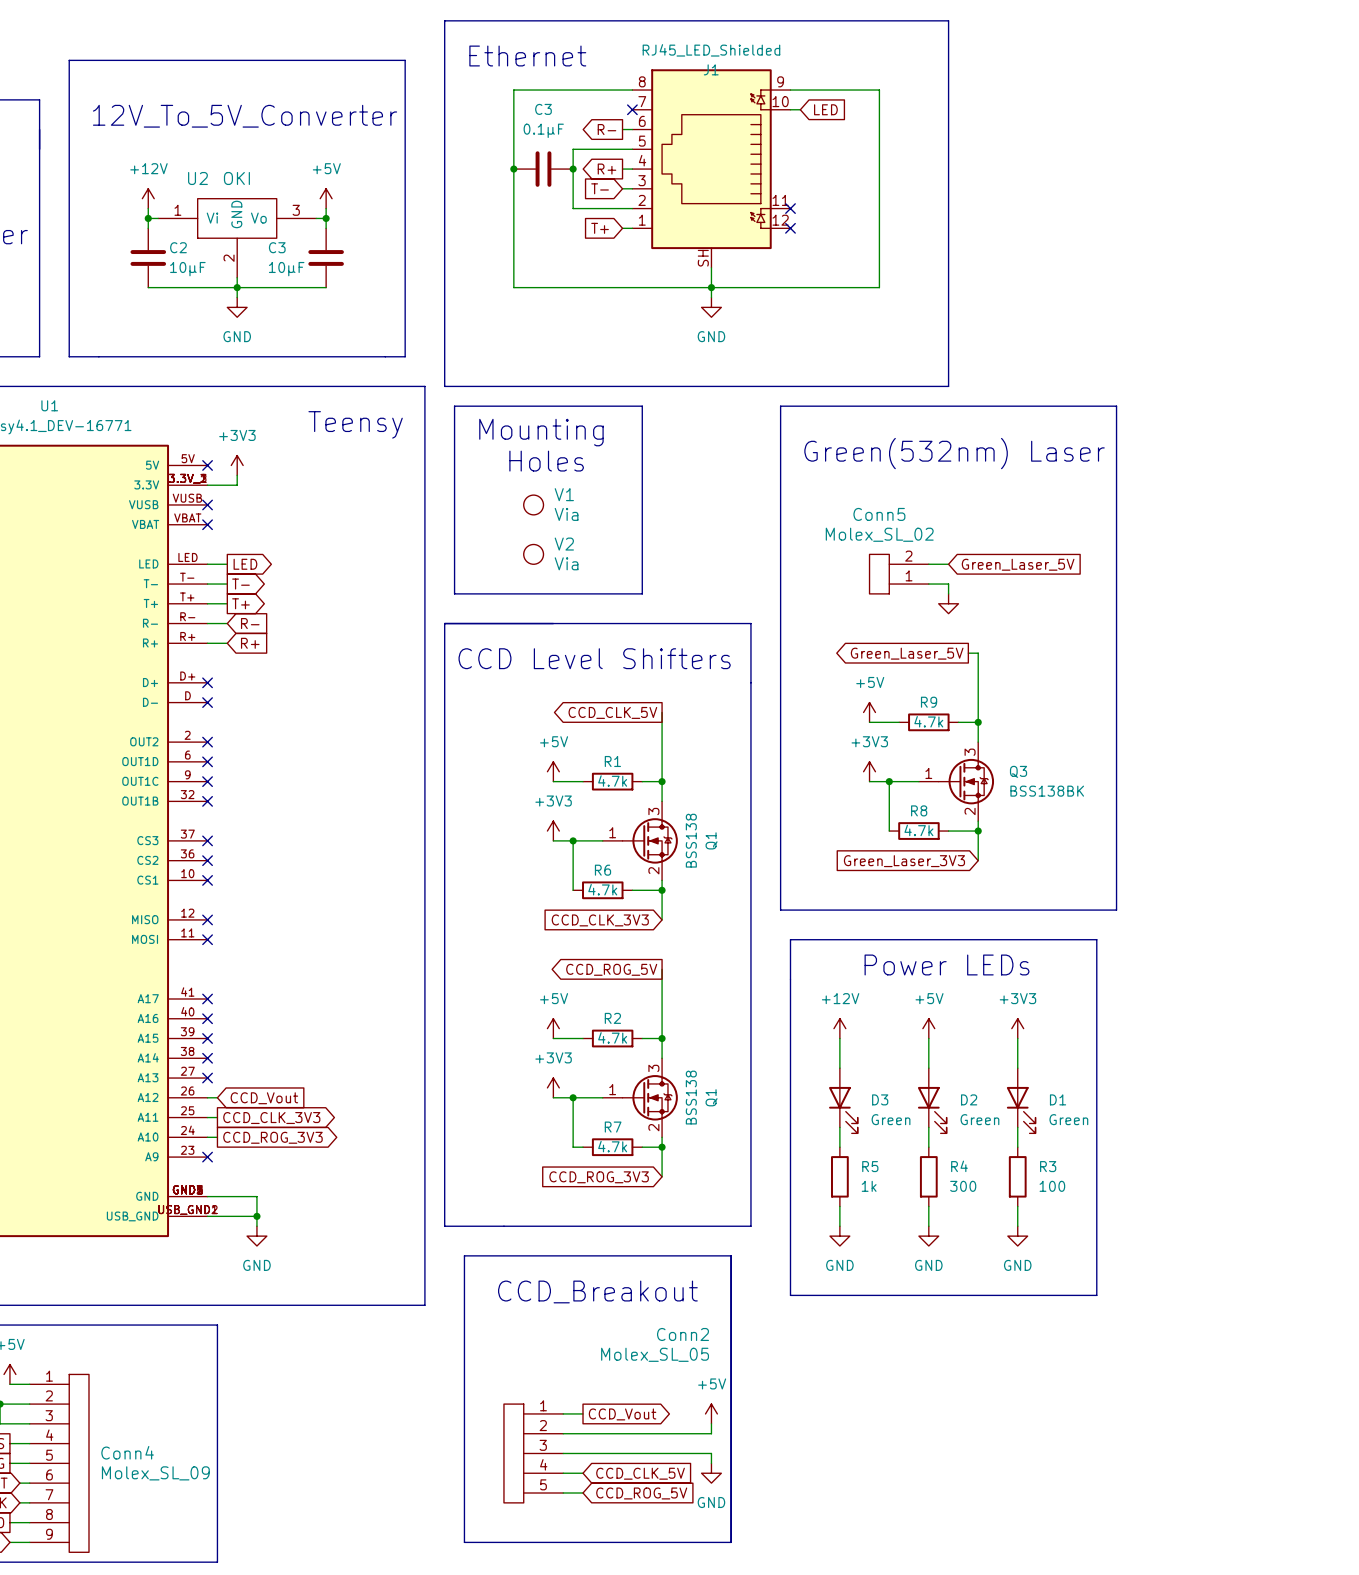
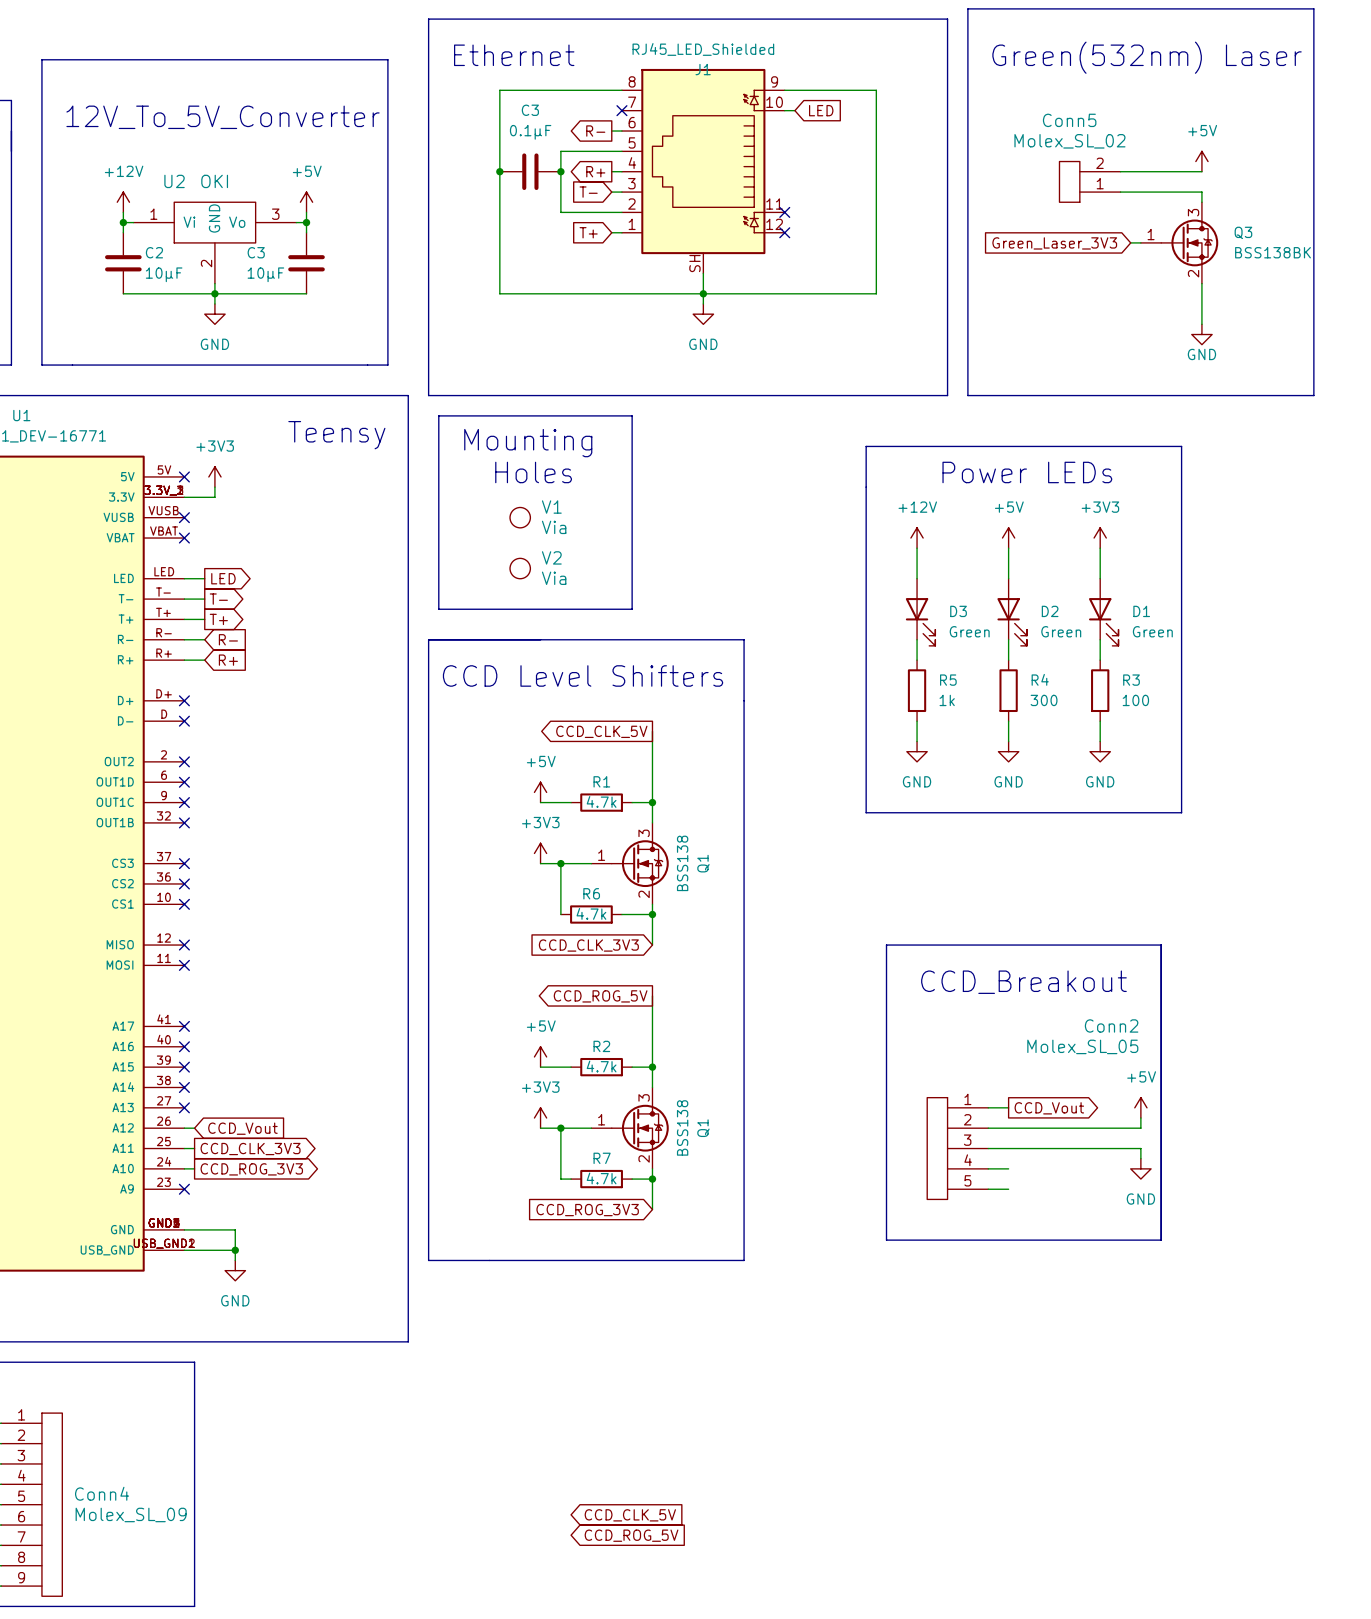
line: none -> (967, 8) (1313, 8) (1313, 395) (967, 395) (967, 8)
text: none -> Green(532nm) Laser (1147, 57)
power symbol: none -> +5V (1201, 161)
wire: none -> (1120, 171) (1201, 171)
wire: none -> (1120, 192) (1201, 192) (1201, 202)
global label: none -> Green_Laser_3V3 (1054, 243)
wire: none -> (1130, 242) (1140, 242)
wire: none -> (1201, 283) (1201, 324)
power symbol: none -> GND (1201, 334)
line: (780, 406) (1116, 406) (1116, 910) (780, 910) (780, 406) -> none
line: none -> (866, 446) (866, 812) (1181, 812) (1181, 446) (866, 446)
text: Green(532nm) Laser (954, 453) -> none
text: none -> Power LEDs (1027, 472)
power symbol: none -> +12V (917, 538)
power symbol: none -> +5V (1008, 538)
power symbol: none -> +3V3 (1100, 538)
wire: none -> (917, 548) (917, 578)
wire: none -> (1008, 548) (1008, 578)
wire: none -> (1100, 548) (1100, 578)
wire: (928, 564) (948, 564) -> none
global label: Green_Laser_5V (1018, 564) -> none
Conn5 position: (899, 574) -> (1090, 181)
wire: (928, 584) (948, 584) (948, 593) -> none
power symbol: (948, 603) -> none
wire: none -> (917, 639) (917, 660)
wire: none -> (1008, 639) (1008, 660)
wire: none -> (1100, 639) (1100, 660)
global label: Green_Laser_5V (907, 653) -> none
wire: (968, 653) (978, 653) (978, 742) -> none
wire: none -> (917, 721) (917, 741)
wire: none -> (1008, 721) (1008, 741)
wire: none -> (1100, 721) (1100, 741)
power symbol: +5V (869, 712) -> none
wire: (869, 722) (899, 722) -> none
R9: 4.7k (928, 722) -> none
wire: (958, 722) (978, 722) -> none
junction: (978, 722) -> none
power symbol: none -> GND (917, 751)
power symbol: none -> GND (1008, 751)
power symbol: none -> GND (1100, 751)
power symbol: +3V3 (869, 771) -> none
wire: (869, 781) (918, 781) -> none
wire: (889, 781) (889, 831) -> none
junction: (889, 781) -> none
Q3 position: (956, 781) -> (1179, 242)
wire: (978, 821) (978, 860) -> none
R8: 4.7k (918, 831) -> none
wire: (948, 831) (978, 831) -> none
junction: (978, 831) -> none
global label: Green_Laser_3V3 (904, 861) -> none
line: none -> (886, 945) (886, 1240) (1161, 1240) (1161, 945) (886, 945)
line: (790, 939) (790, 1295) (1096, 1295) (1096, 939) (790, 939) -> none
text: none -> CCD_Breakout (1023, 982)
text: Power LEDs (947, 964) -> none
power symbol: +12V (839, 1028) -> none
power symbol: +5V (928, 1028) -> none
power symbol: +3V3 (1017, 1028) -> none
wire: (839, 1038) (839, 1068) -> none
wire: (928, 1038) (928, 1068) -> none
wire: (1017, 1038) (1017, 1068) -> none
wire: none -> (988, 1107) (1008, 1107)
global label: none -> CCD_Vout (1049, 1108)
power symbol: none -> +5V (1140, 1107)
wire: none -> (1140, 1118) (1140, 1128) (988, 1128)
D3 position: (843, 1100) -> (920, 612)
D2 position: (932, 1100) -> (1012, 612)
D1 position: (1021, 1100) -> (1103, 612)
wire: none -> (988, 1148) (1140, 1148) (1140, 1158)
wire: (839, 1127) (839, 1147) -> none
wire: (1017, 1127) (1017, 1147) -> none
wire: none -> (988, 1168) (1008, 1168)
power symbol: none -> GND (1140, 1168)
wire: none -> (988, 1189) (1008, 1189)
R5 position: (839, 1176) -> (917, 690)
R4 position: (928, 1176) -> (1008, 690)
R3 position: (1017, 1176) -> (1100, 690)
wire: (839, 1206) (839, 1226) -> none
wire: (928, 1206) (928, 1226) -> none
wire: (1017, 1206) (1017, 1226) -> none
power symbol: GND (839, 1236) -> none
power symbol: GND (928, 1236) -> none
power symbol: GND (1017, 1236) -> none
line: (464, 1255) (464, 1542) (731, 1542) (731, 1255) (464, 1255) -> none
text: CCD_Breakout (597, 1291) -> none
wire: (563, 1413) (583, 1413) -> none
power symbol: +5V (711, 1413) -> none
global label: CCD_Vout (622, 1414) -> none
wire: (711, 1423) (711, 1433) (563, 1433) -> none
Conn2 position: (533, 1453) -> (957, 1148)
wire: (563, 1453) (711, 1453) (711, 1463) -> none
wire: (563, 1473) (583, 1473) -> none
power symbol: GND (711, 1473) -> none
wire: (563, 1493) (583, 1493) -> none

